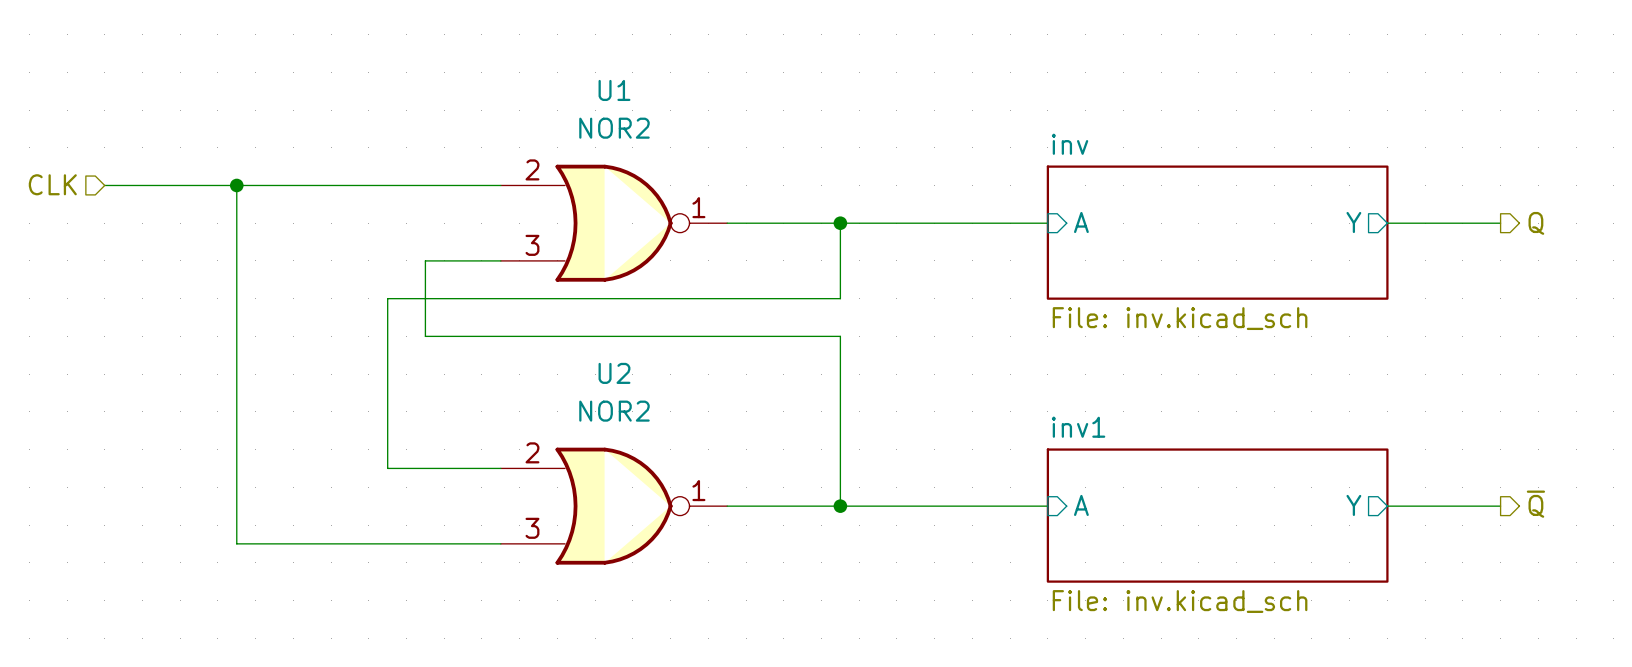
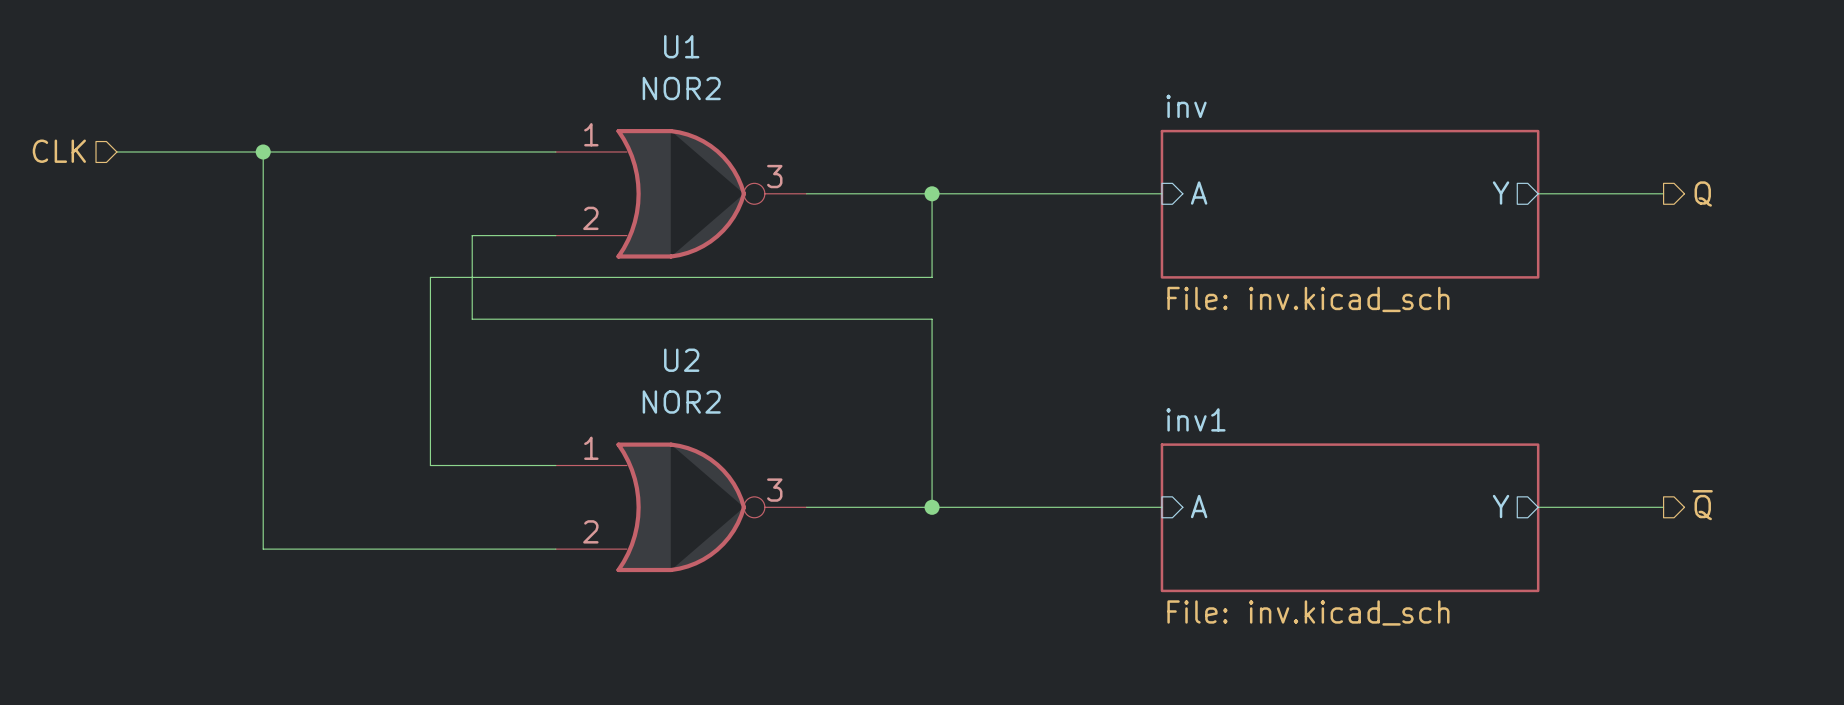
U1 pin number: 2 (532, 169) -> 1 (591, 134)
U1 pin number: 1 (698, 207) -> 3 (774, 176)
U1 pin number: 3 (532, 245) -> 2 (590, 218)
U2 pin number: 2 (532, 452) -> 1 (591, 448)
U2 pin number: 1 (698, 490) -> 3 (774, 490)
U2 pin number: 3 (532, 528) -> 2 (590, 531)

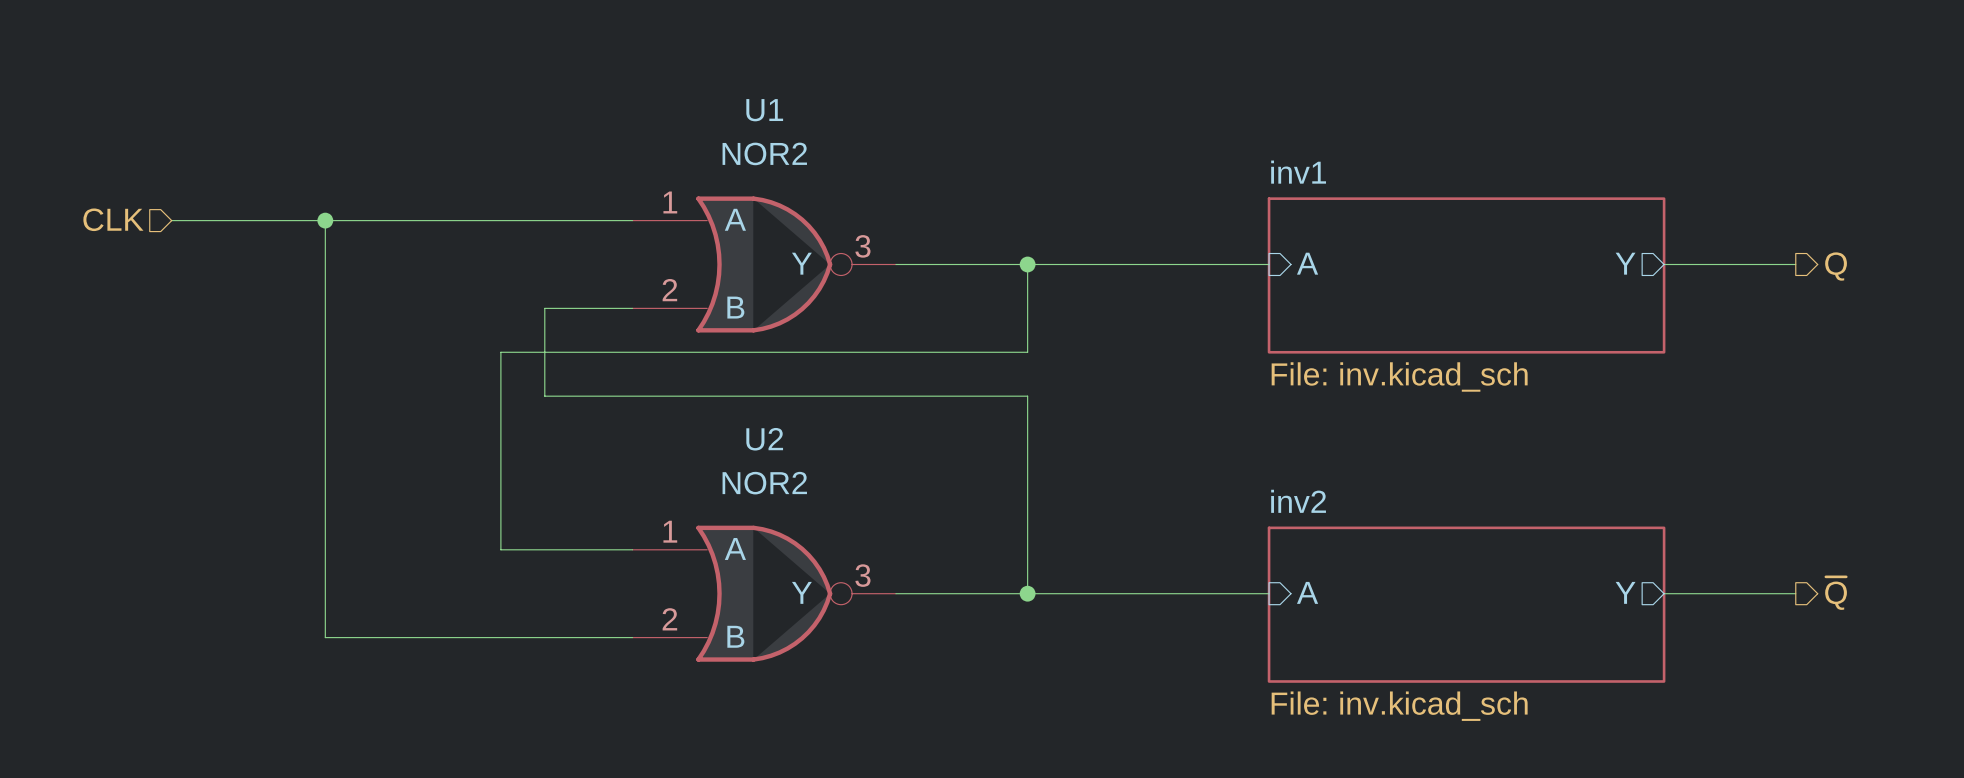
sheet inv name: inv (1186, 106) -> inv1 (1298, 172)
U1 pin name: none -> A (735, 219)
U1 pin name: none -> Y (801, 263)
U1 pin name: none -> B (735, 307)
sheet inv1 name: inv1 (1195, 419) -> inv2 (1298, 501)
U2 pin name: none -> A (735, 548)
U2 pin name: none -> Y (801, 592)
U2 pin name: none -> B (735, 636)

